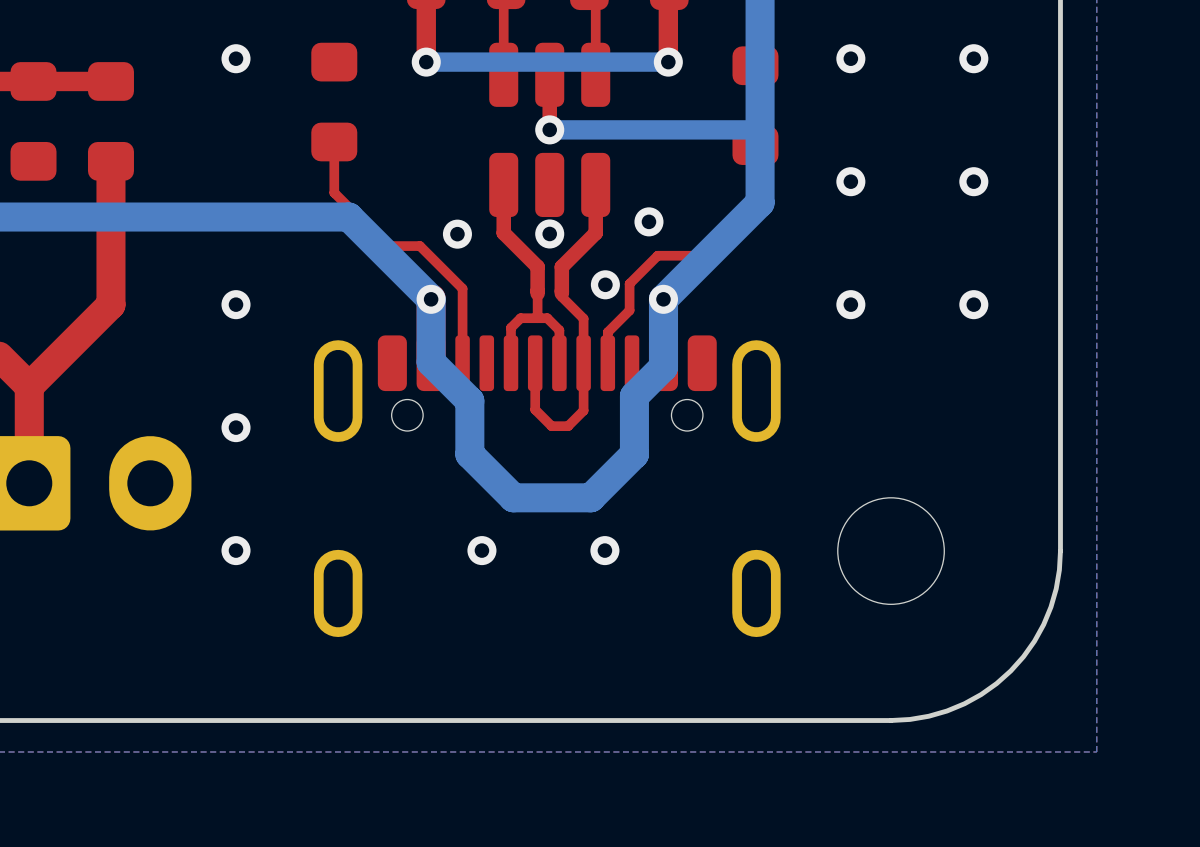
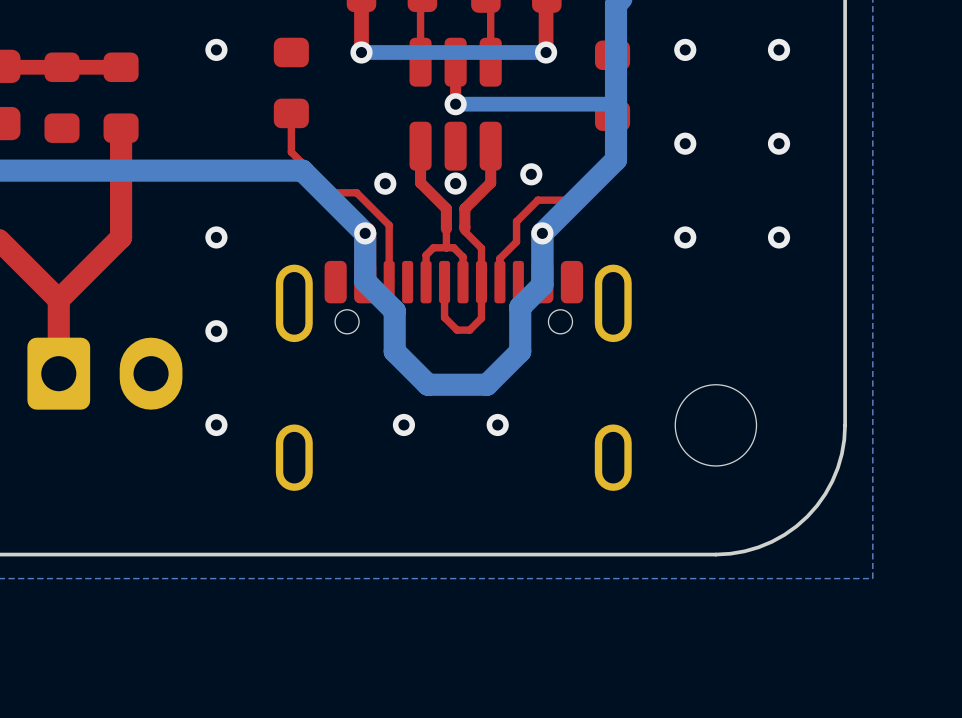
via: (605, 284) -> none

